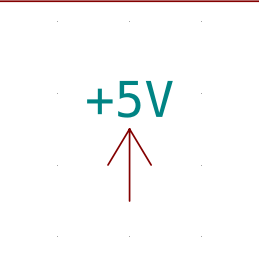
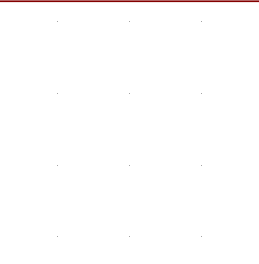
power symbol: +5V (129, 165) -> none

